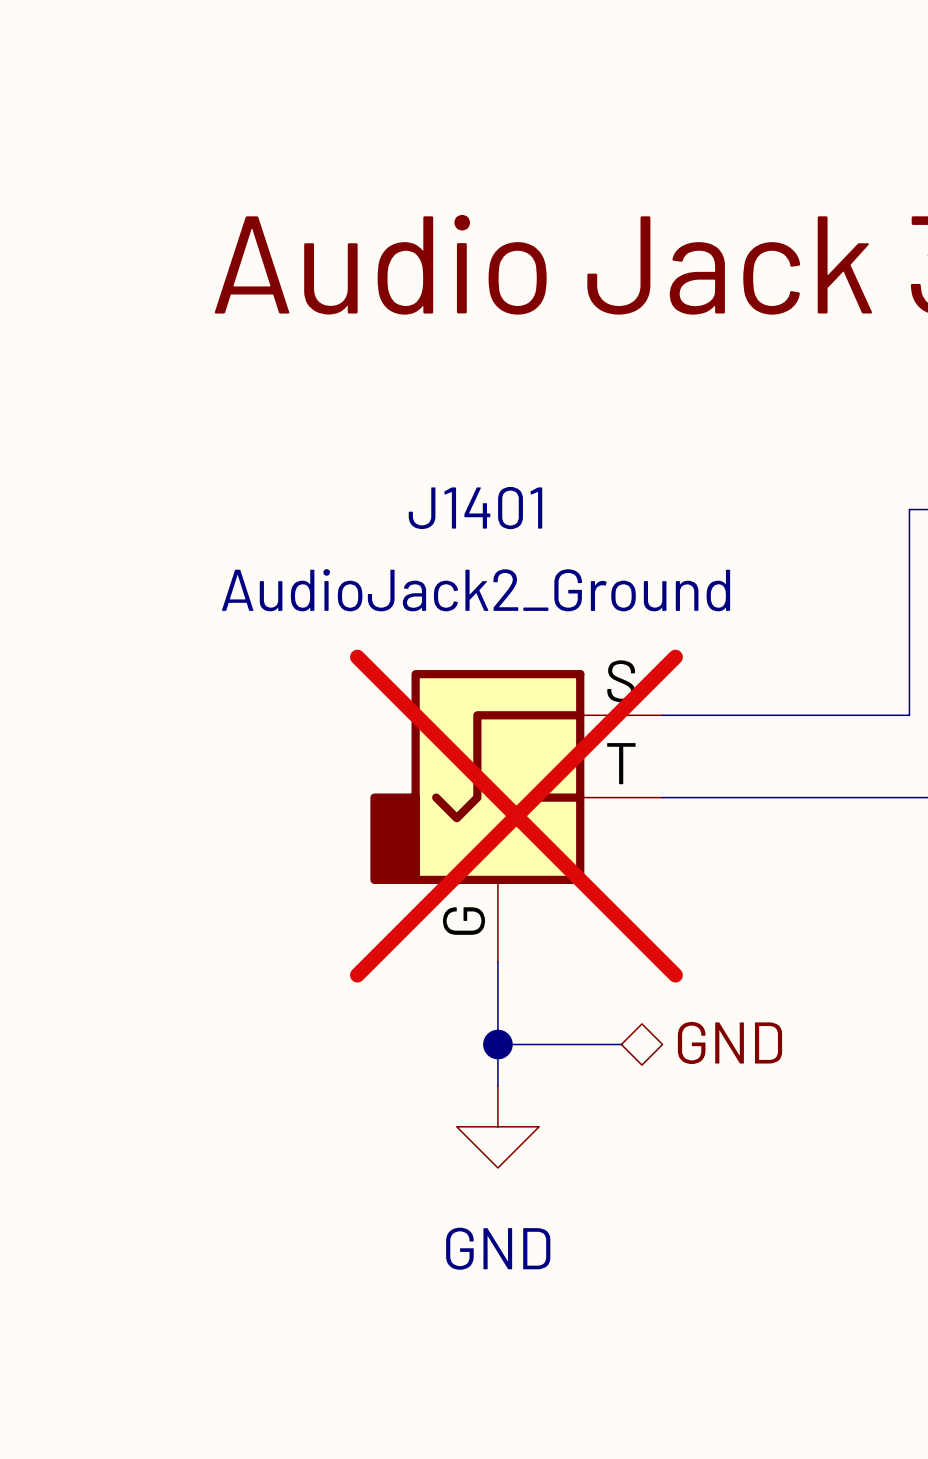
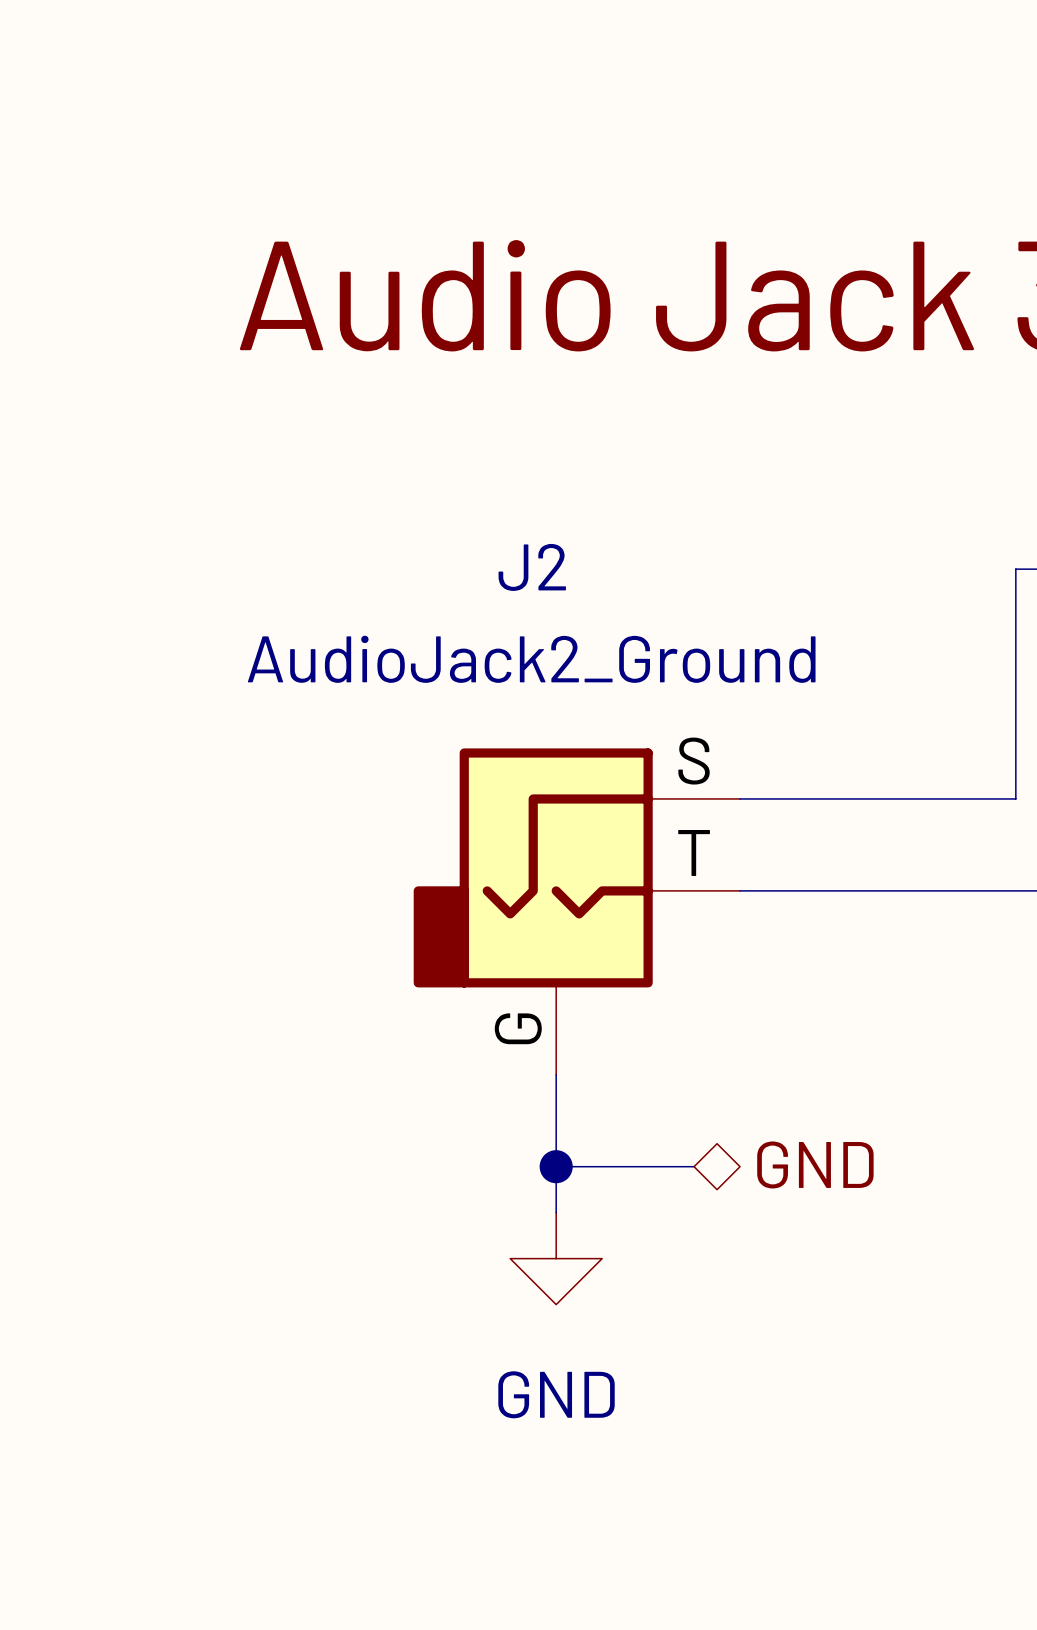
J1401 name: J1401 (475, 508) -> J2 (532, 567)
J1401 do-not-place cross: (516, 816) -> none

